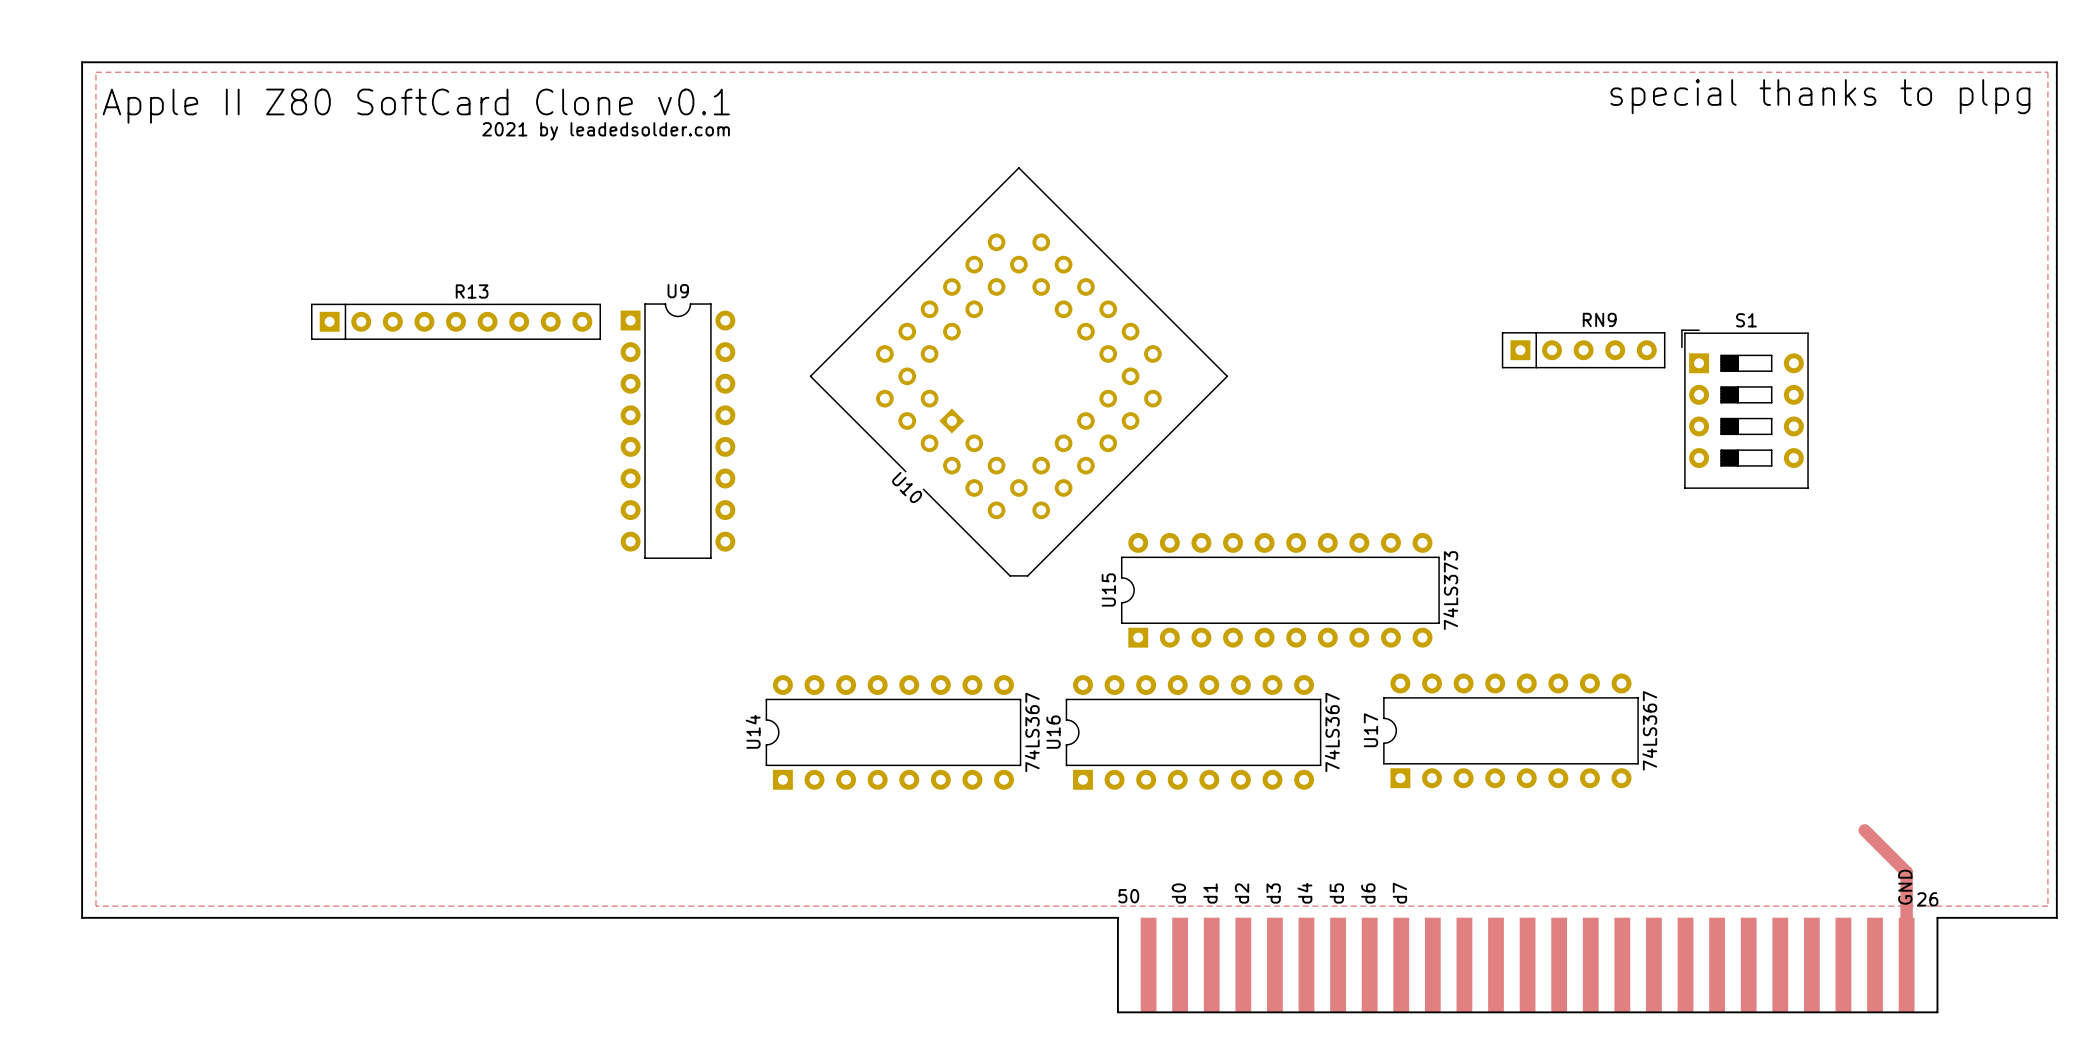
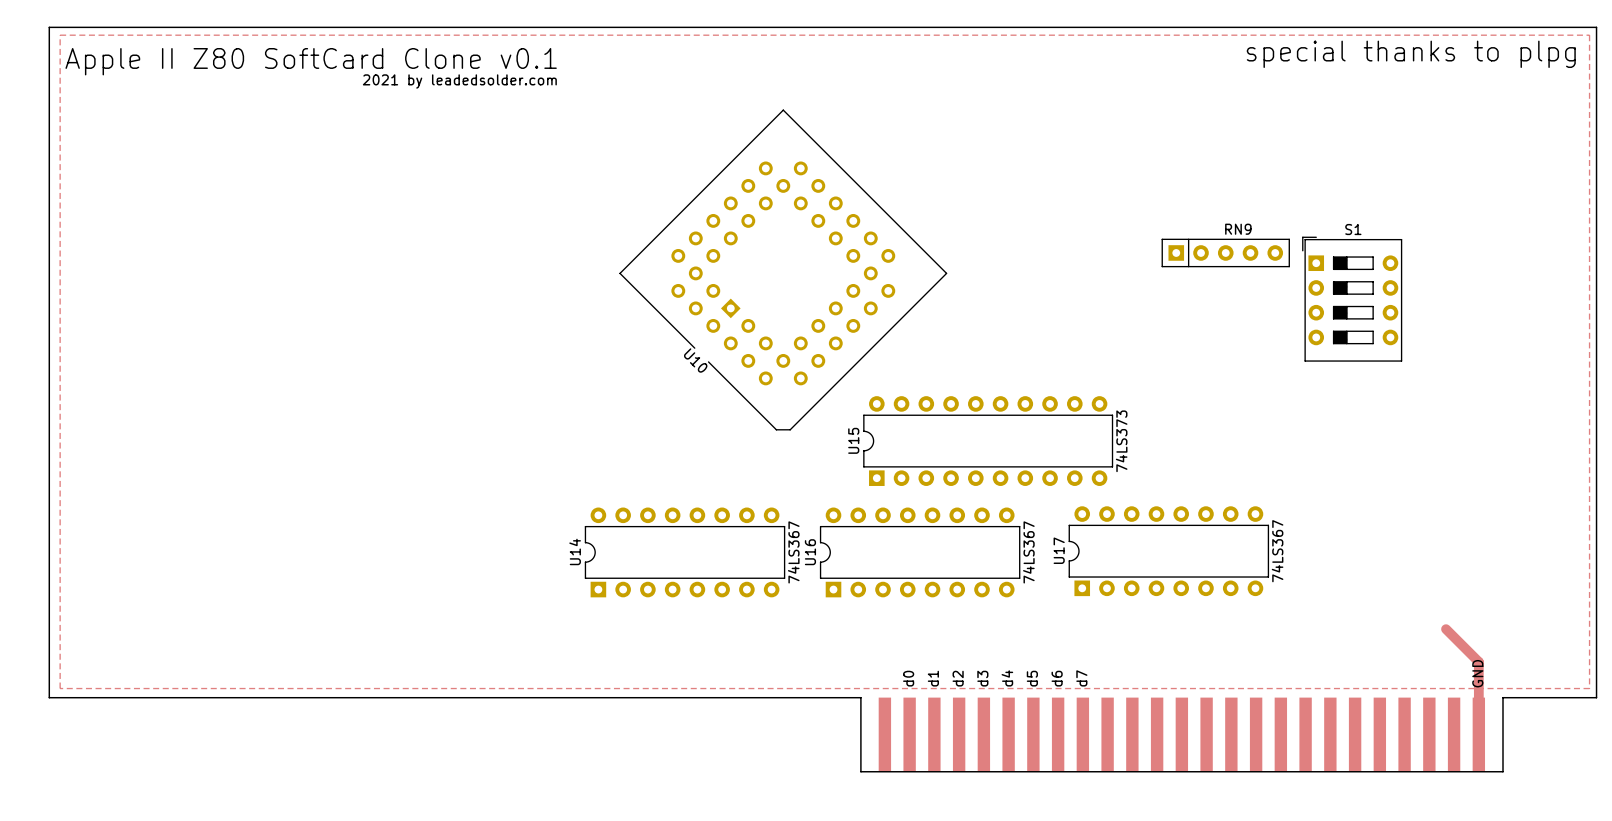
R13: (456, 321) -> none
U9: (677, 431) -> none
text: 50 (1128, 896) -> none
text: 26 (1927, 899) -> none

